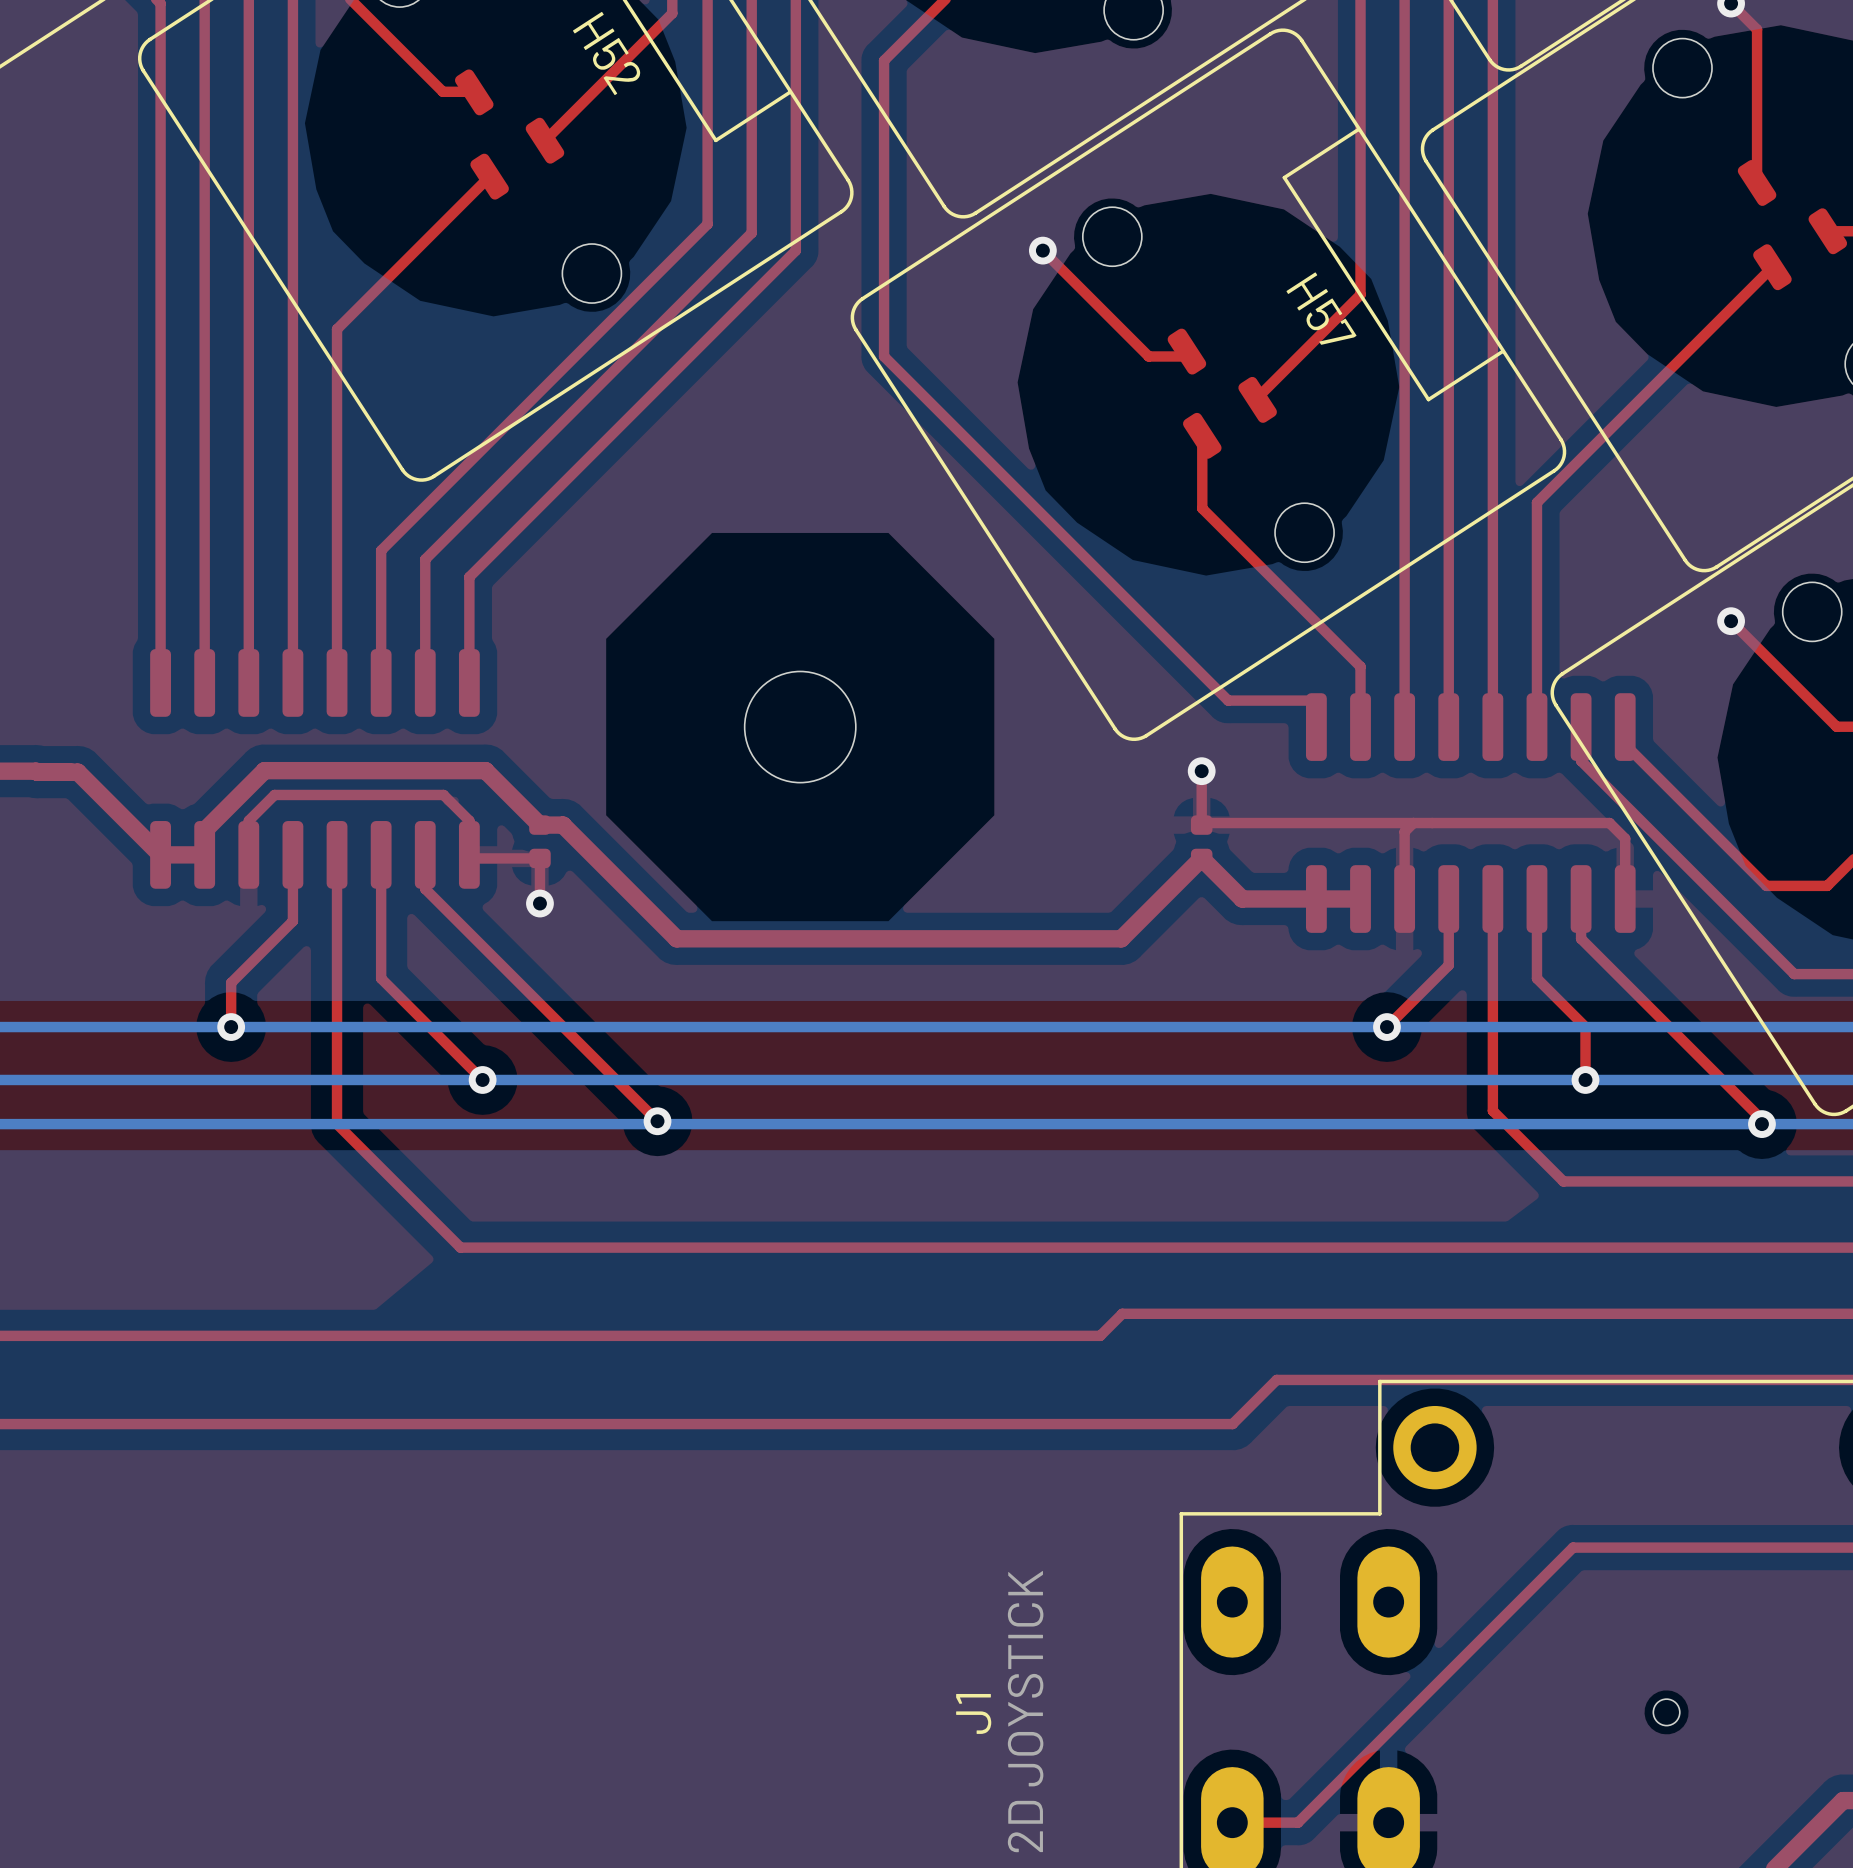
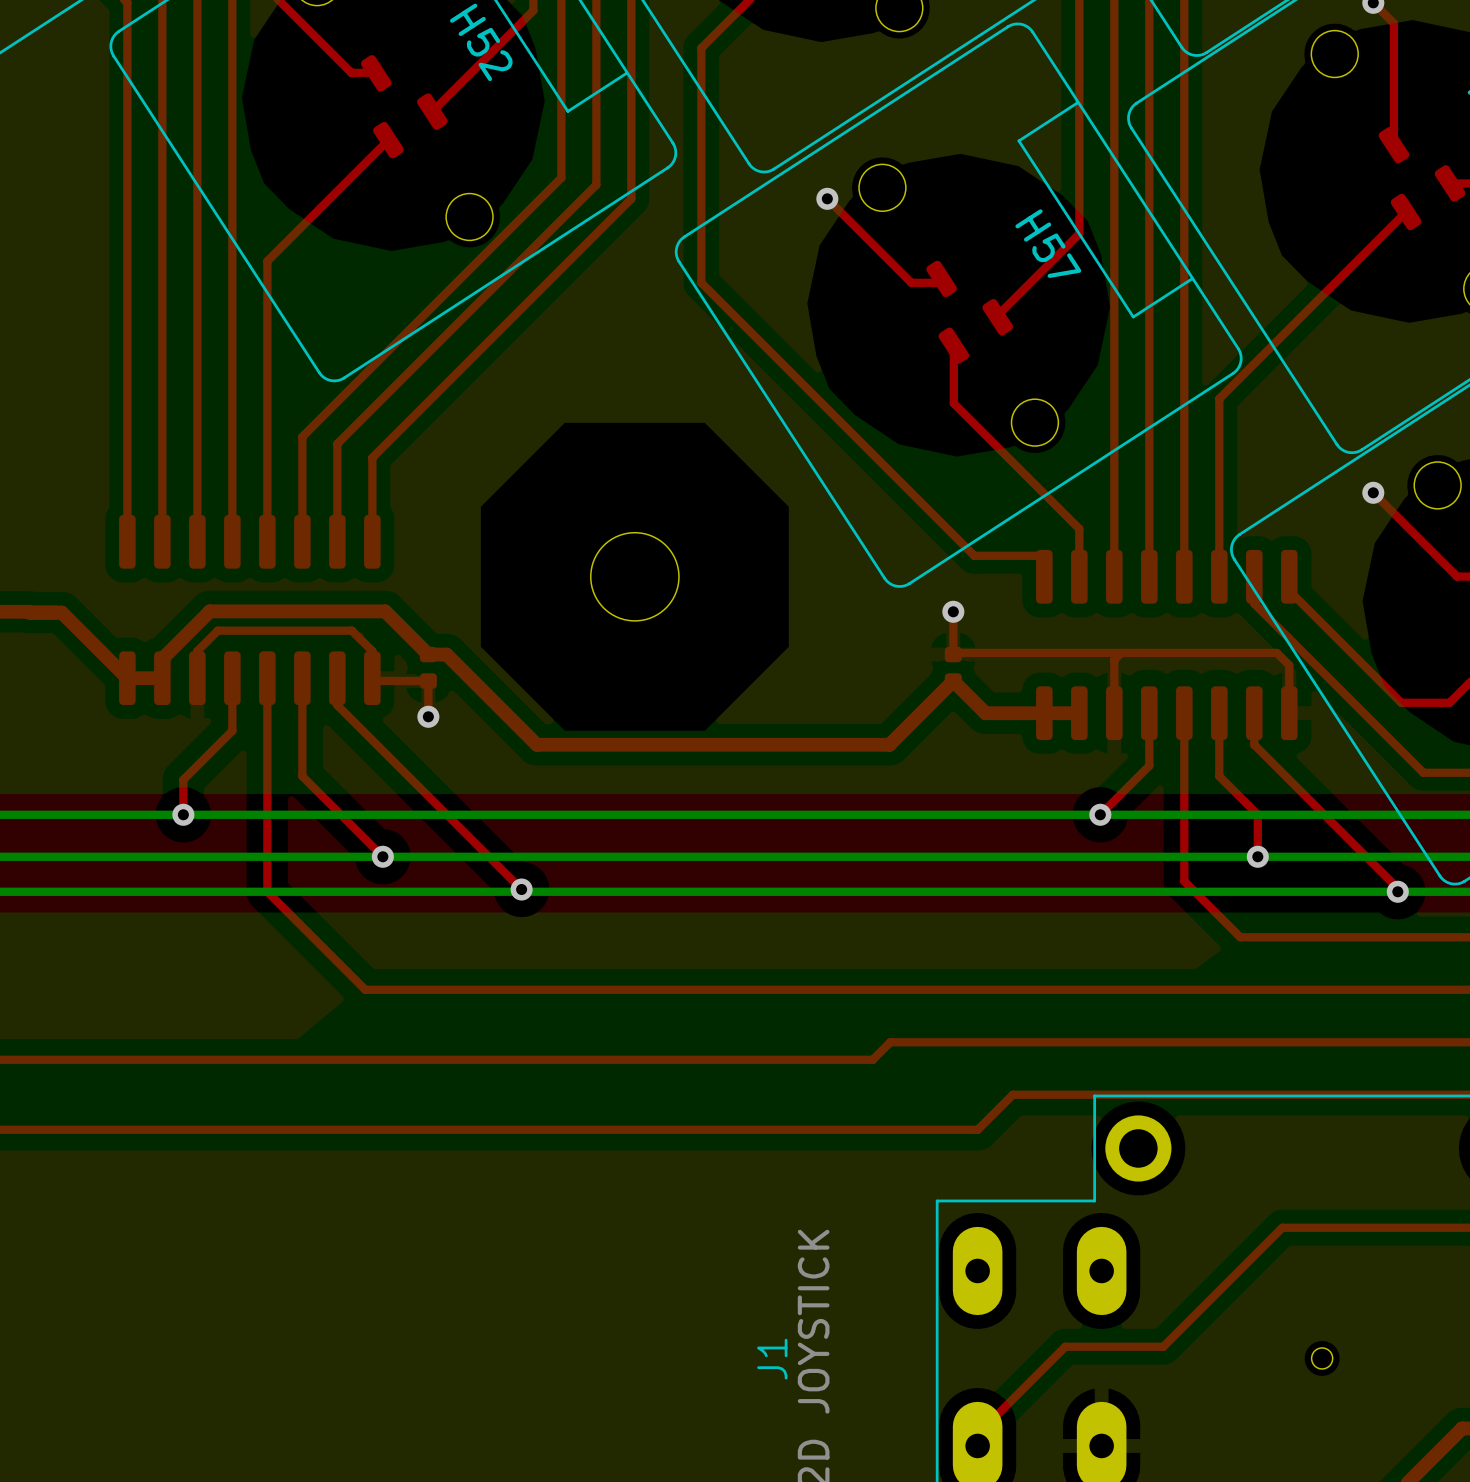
top track: (1616, 1547) (1573, 1547) (1298, 1822) (1232, 1822) -> (1282, 1227) (1163, 1346) (1065, 1346) (977, 1434) (977, 1445)

